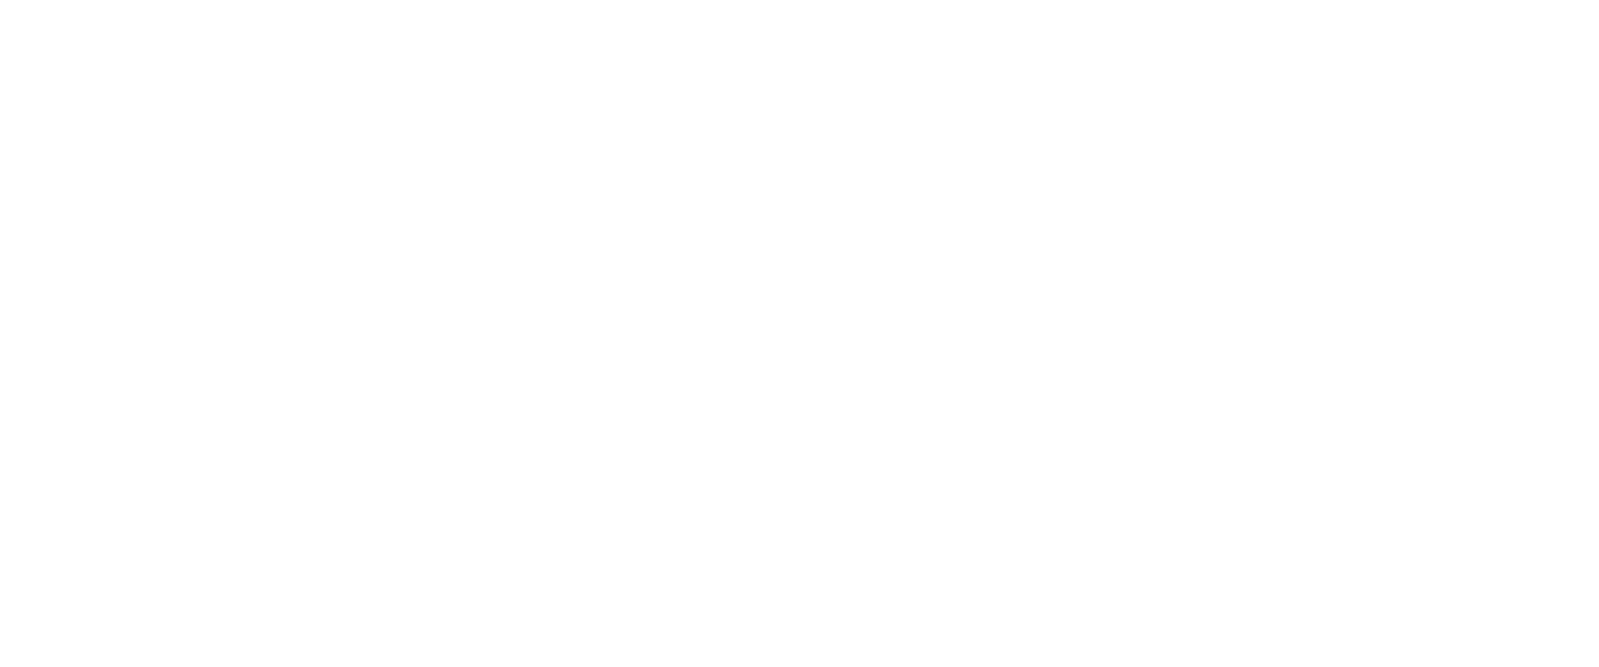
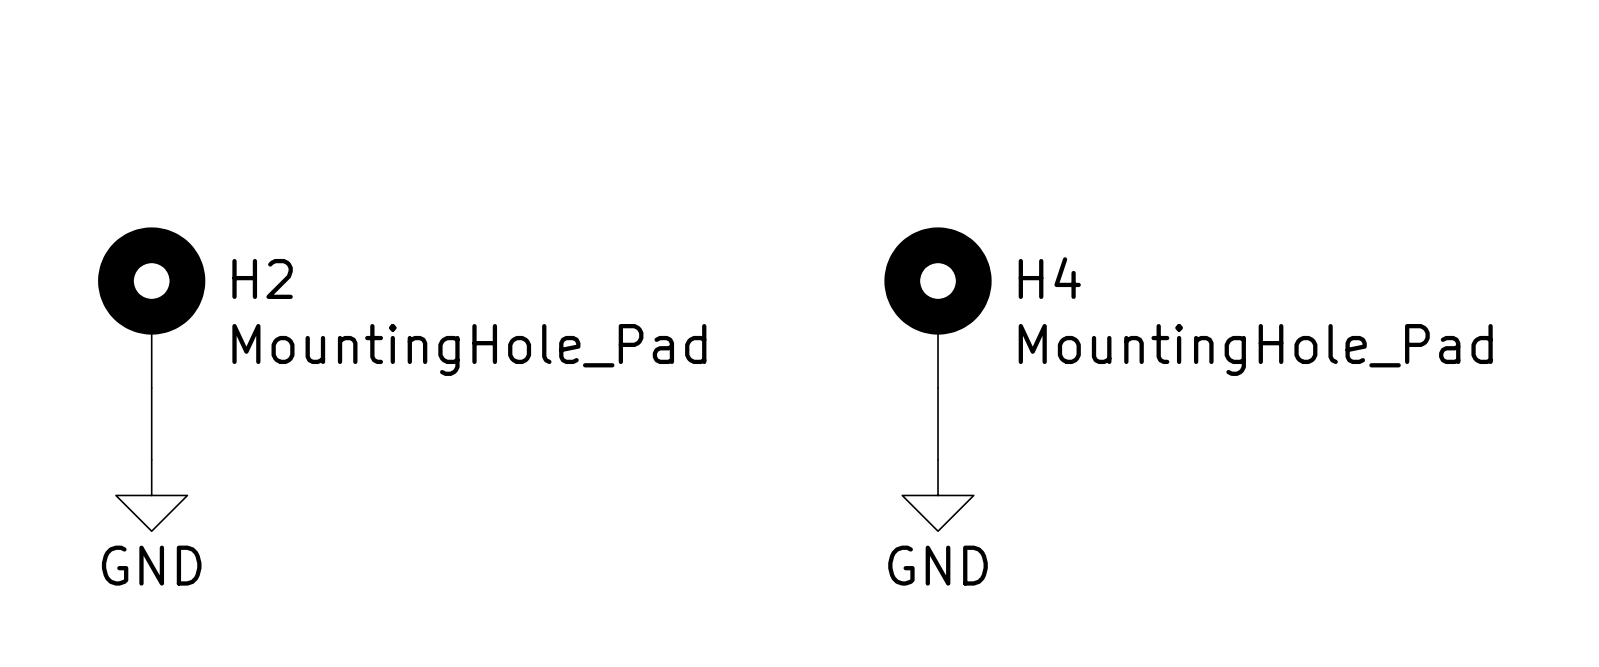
H2: none -> MountingHole_Pad (151, 307)
H4: none -> MountingHole_Pad (938, 307)
wire: none -> (151, 388) (151, 459)
wire: none -> (938, 388) (938, 459)
power symbol: none -> GND (151, 495)
power symbol: none -> GND (938, 495)

